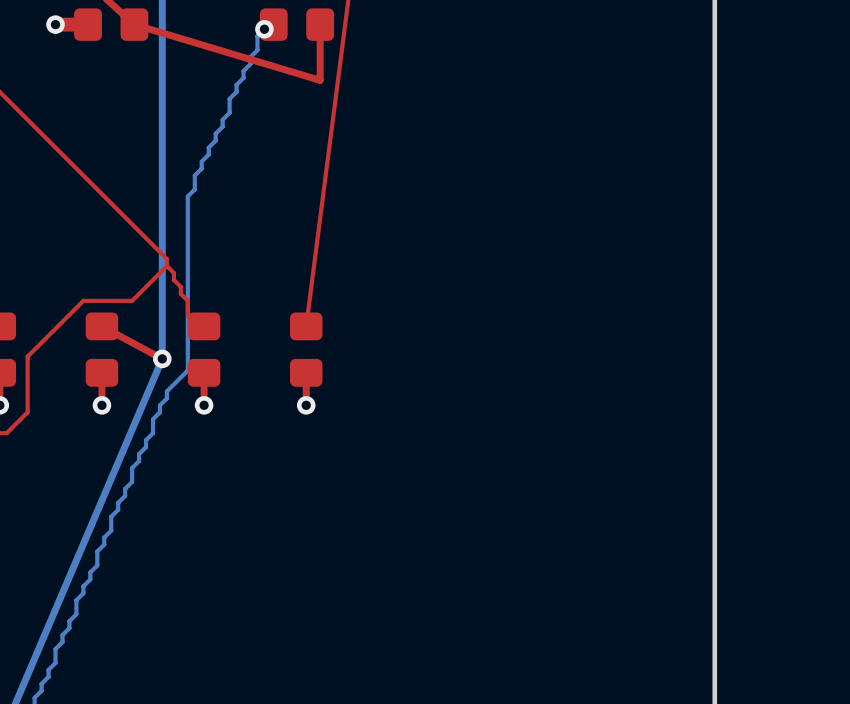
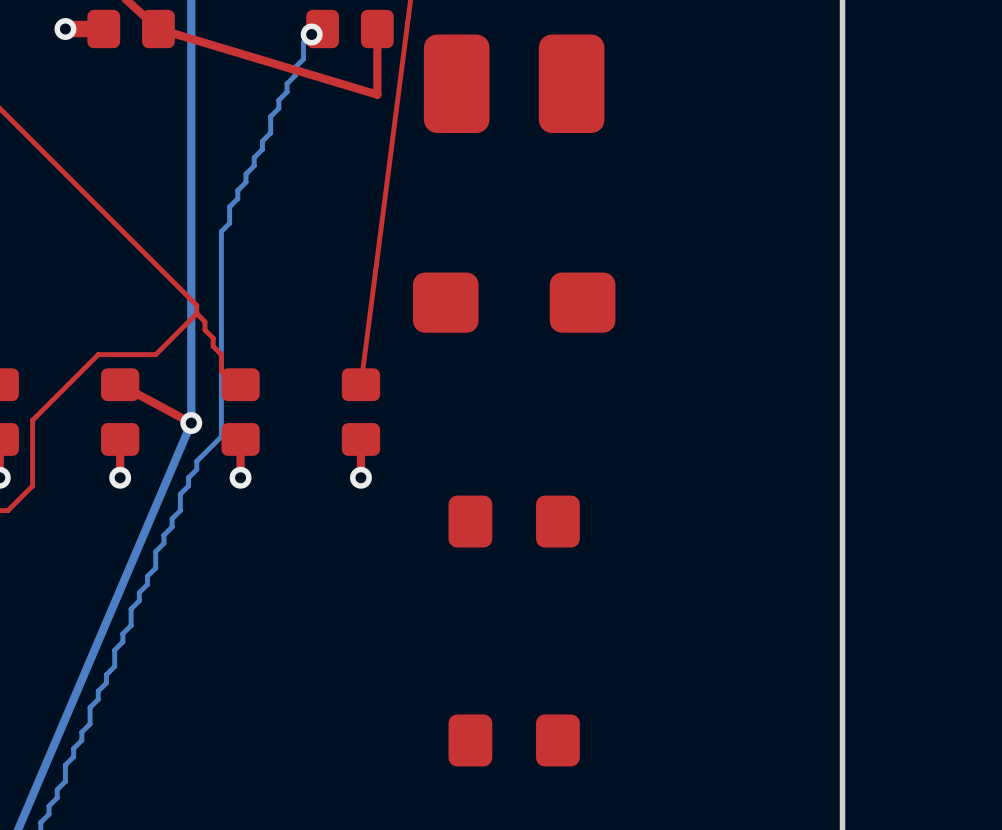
part: none -> (514, 83)
part: none -> (514, 302)
part: none -> (514, 521)
part: none -> (514, 740)

